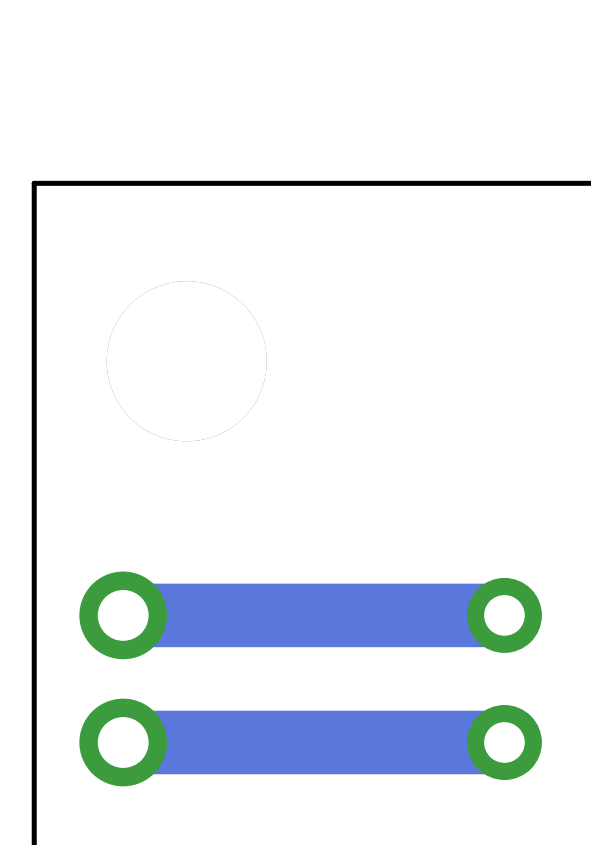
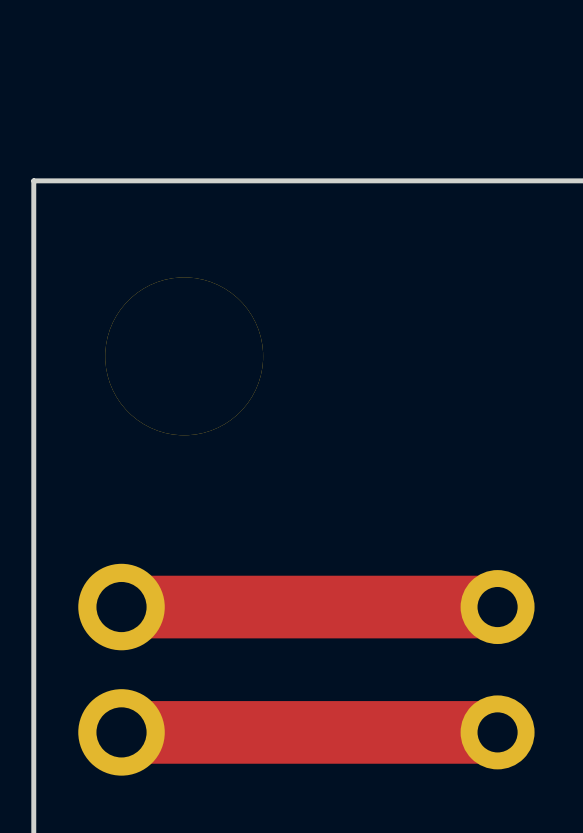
bottom track: (504, 615) (123, 615) -> none
top track: none -> (497, 607) (121, 607)
bottom track: (504, 742) (123, 742) -> none
top track: none -> (497, 732) (121, 732)

